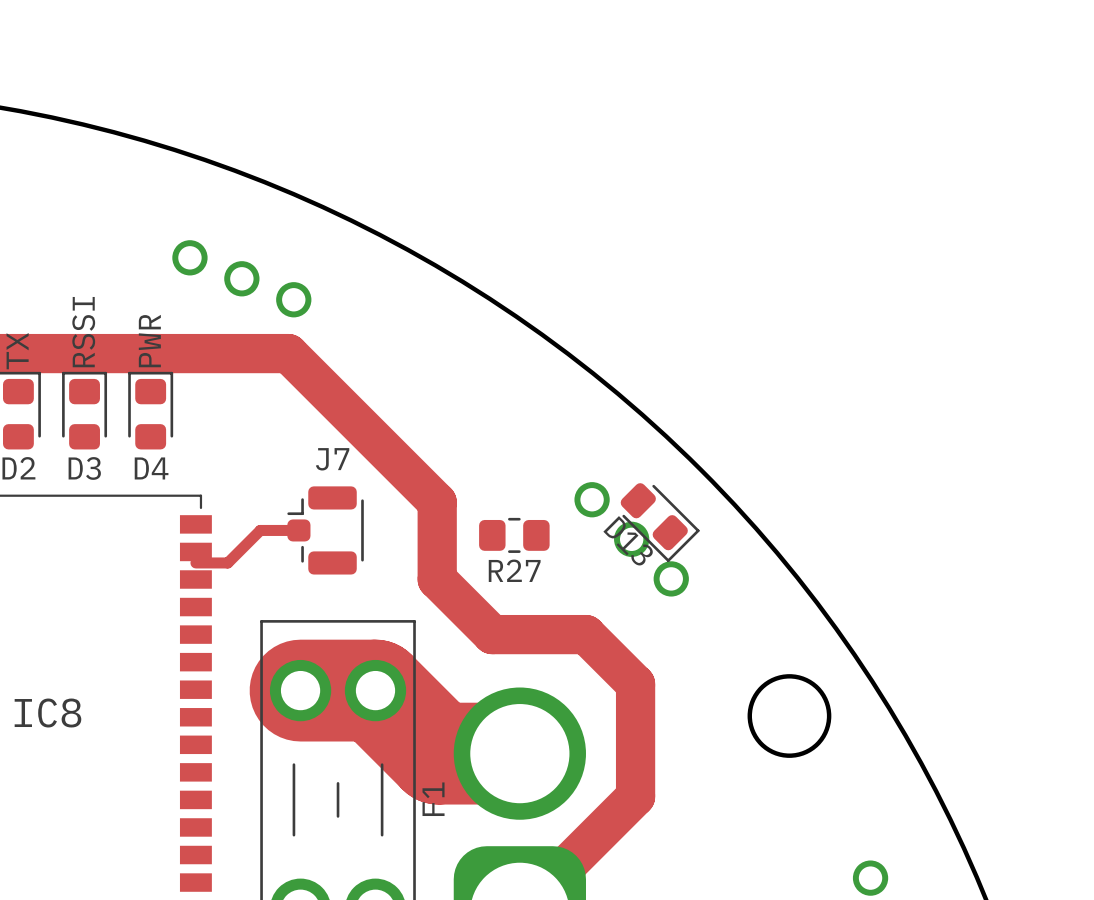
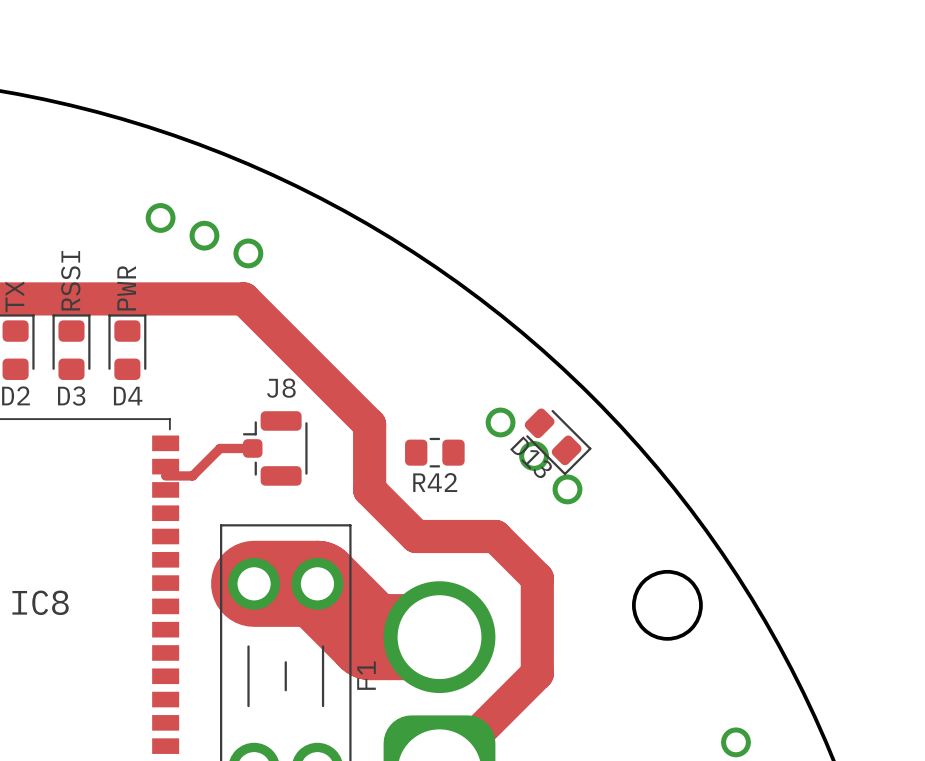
J7 name: J7 (332, 459) -> J8 (281, 388)
R27 name: R27 (514, 570) -> R42 (435, 482)

